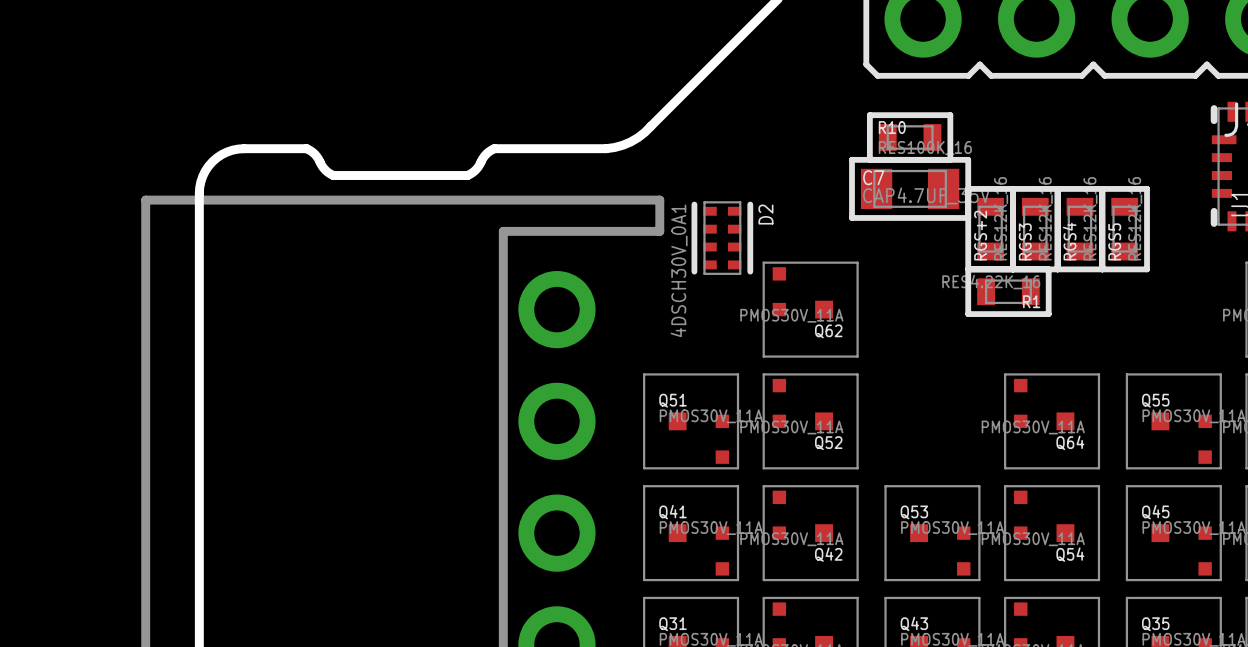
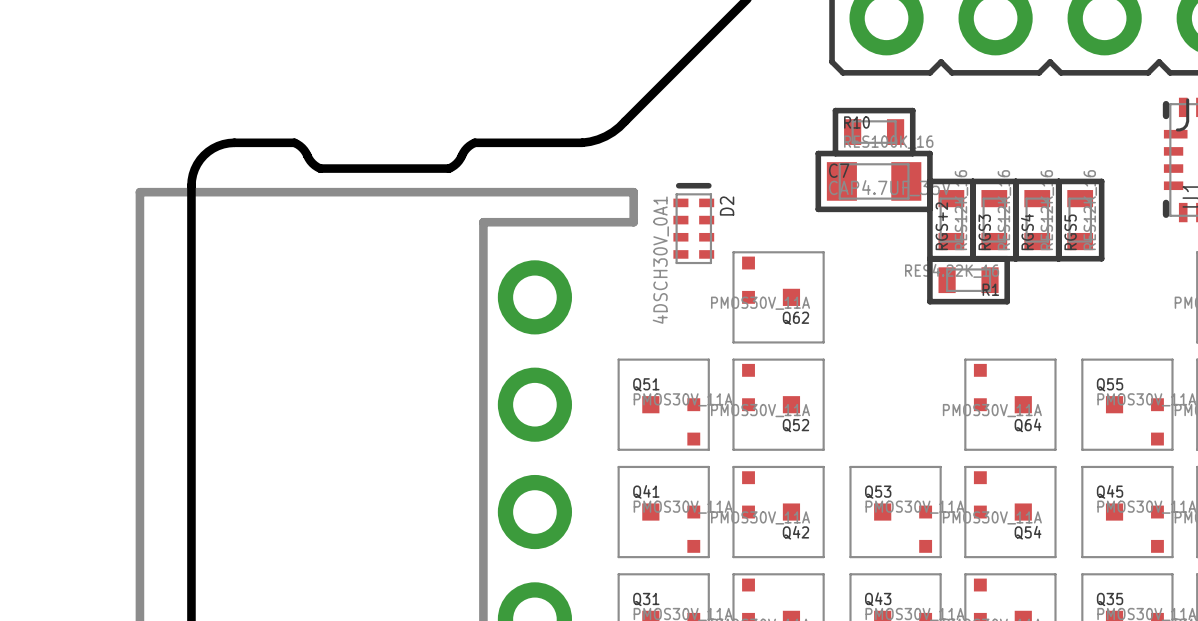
D2 footprint: [691, 201, 754, 275] -> [673, 182, 715, 265]

